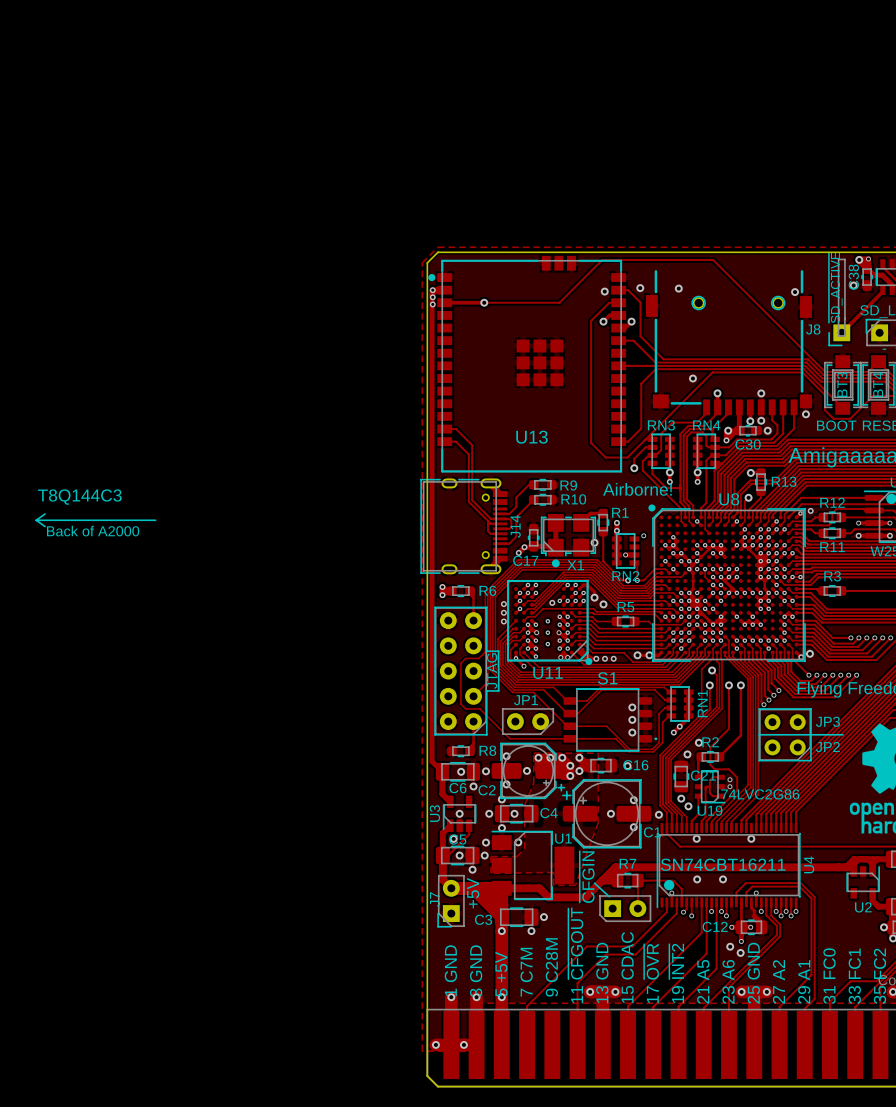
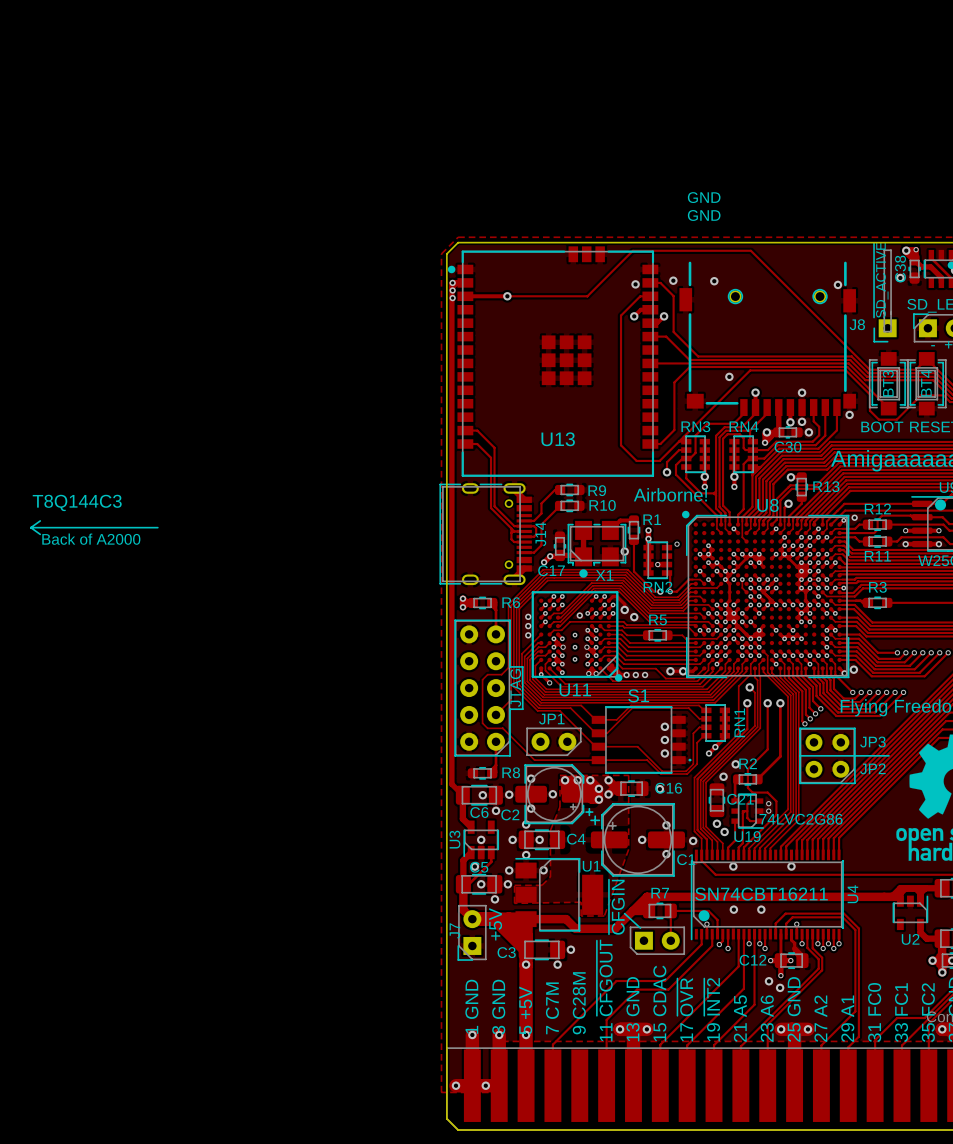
text: none -> GND (704, 197)
text: none -> GND (704, 215)
track: (882, 289) (841, 332) -> none

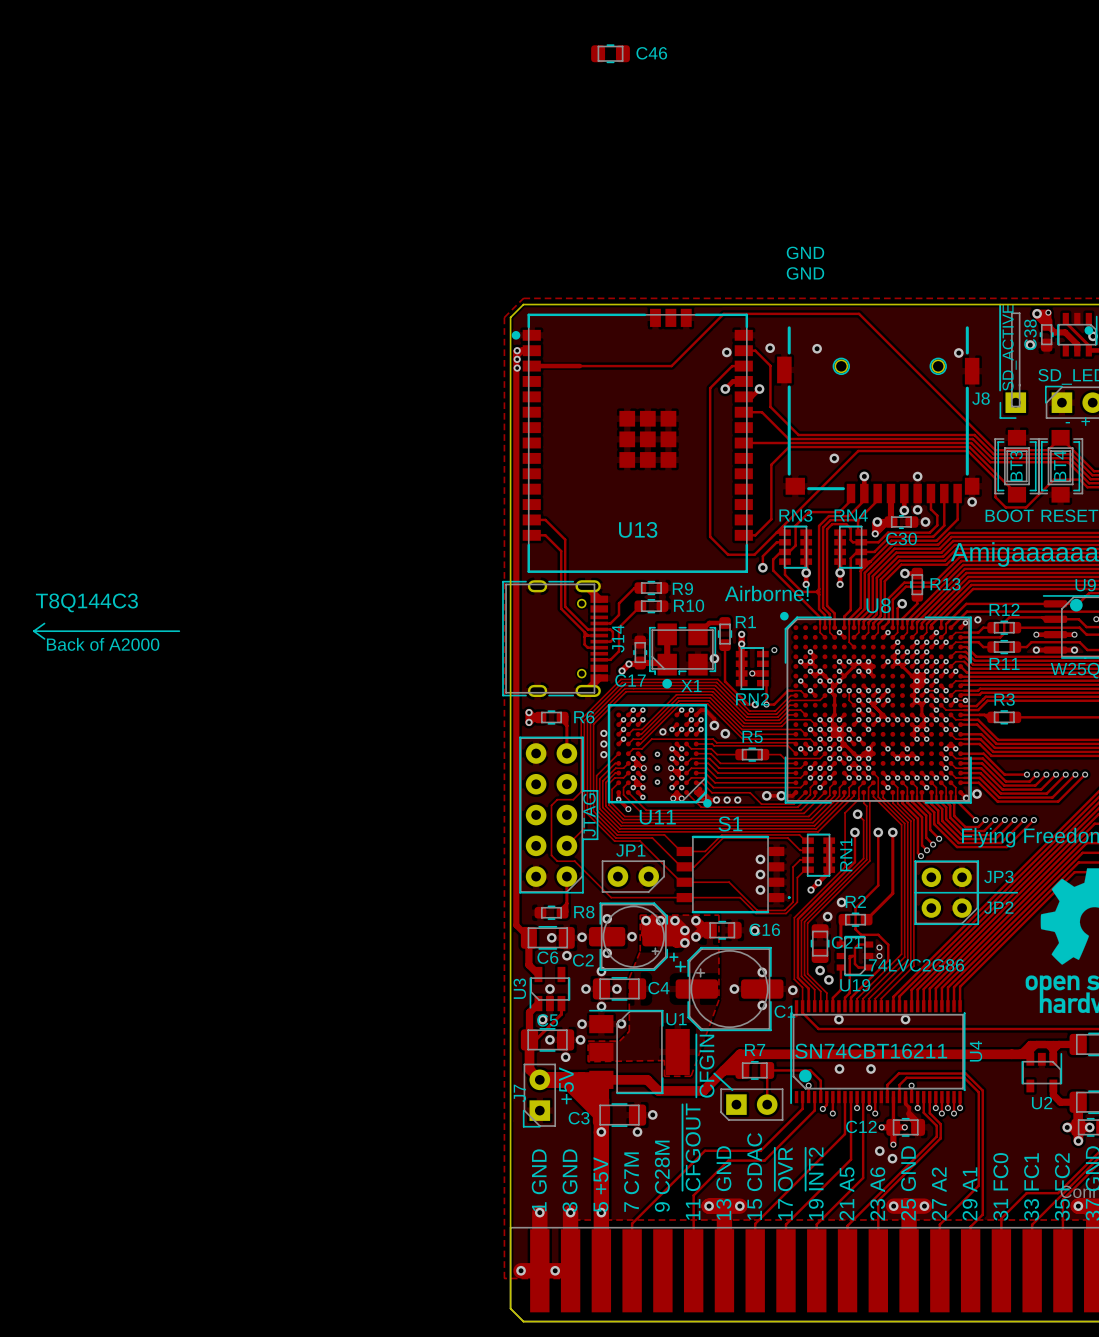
C46: none -> (610, 53)
via: (507, 296) -> none

